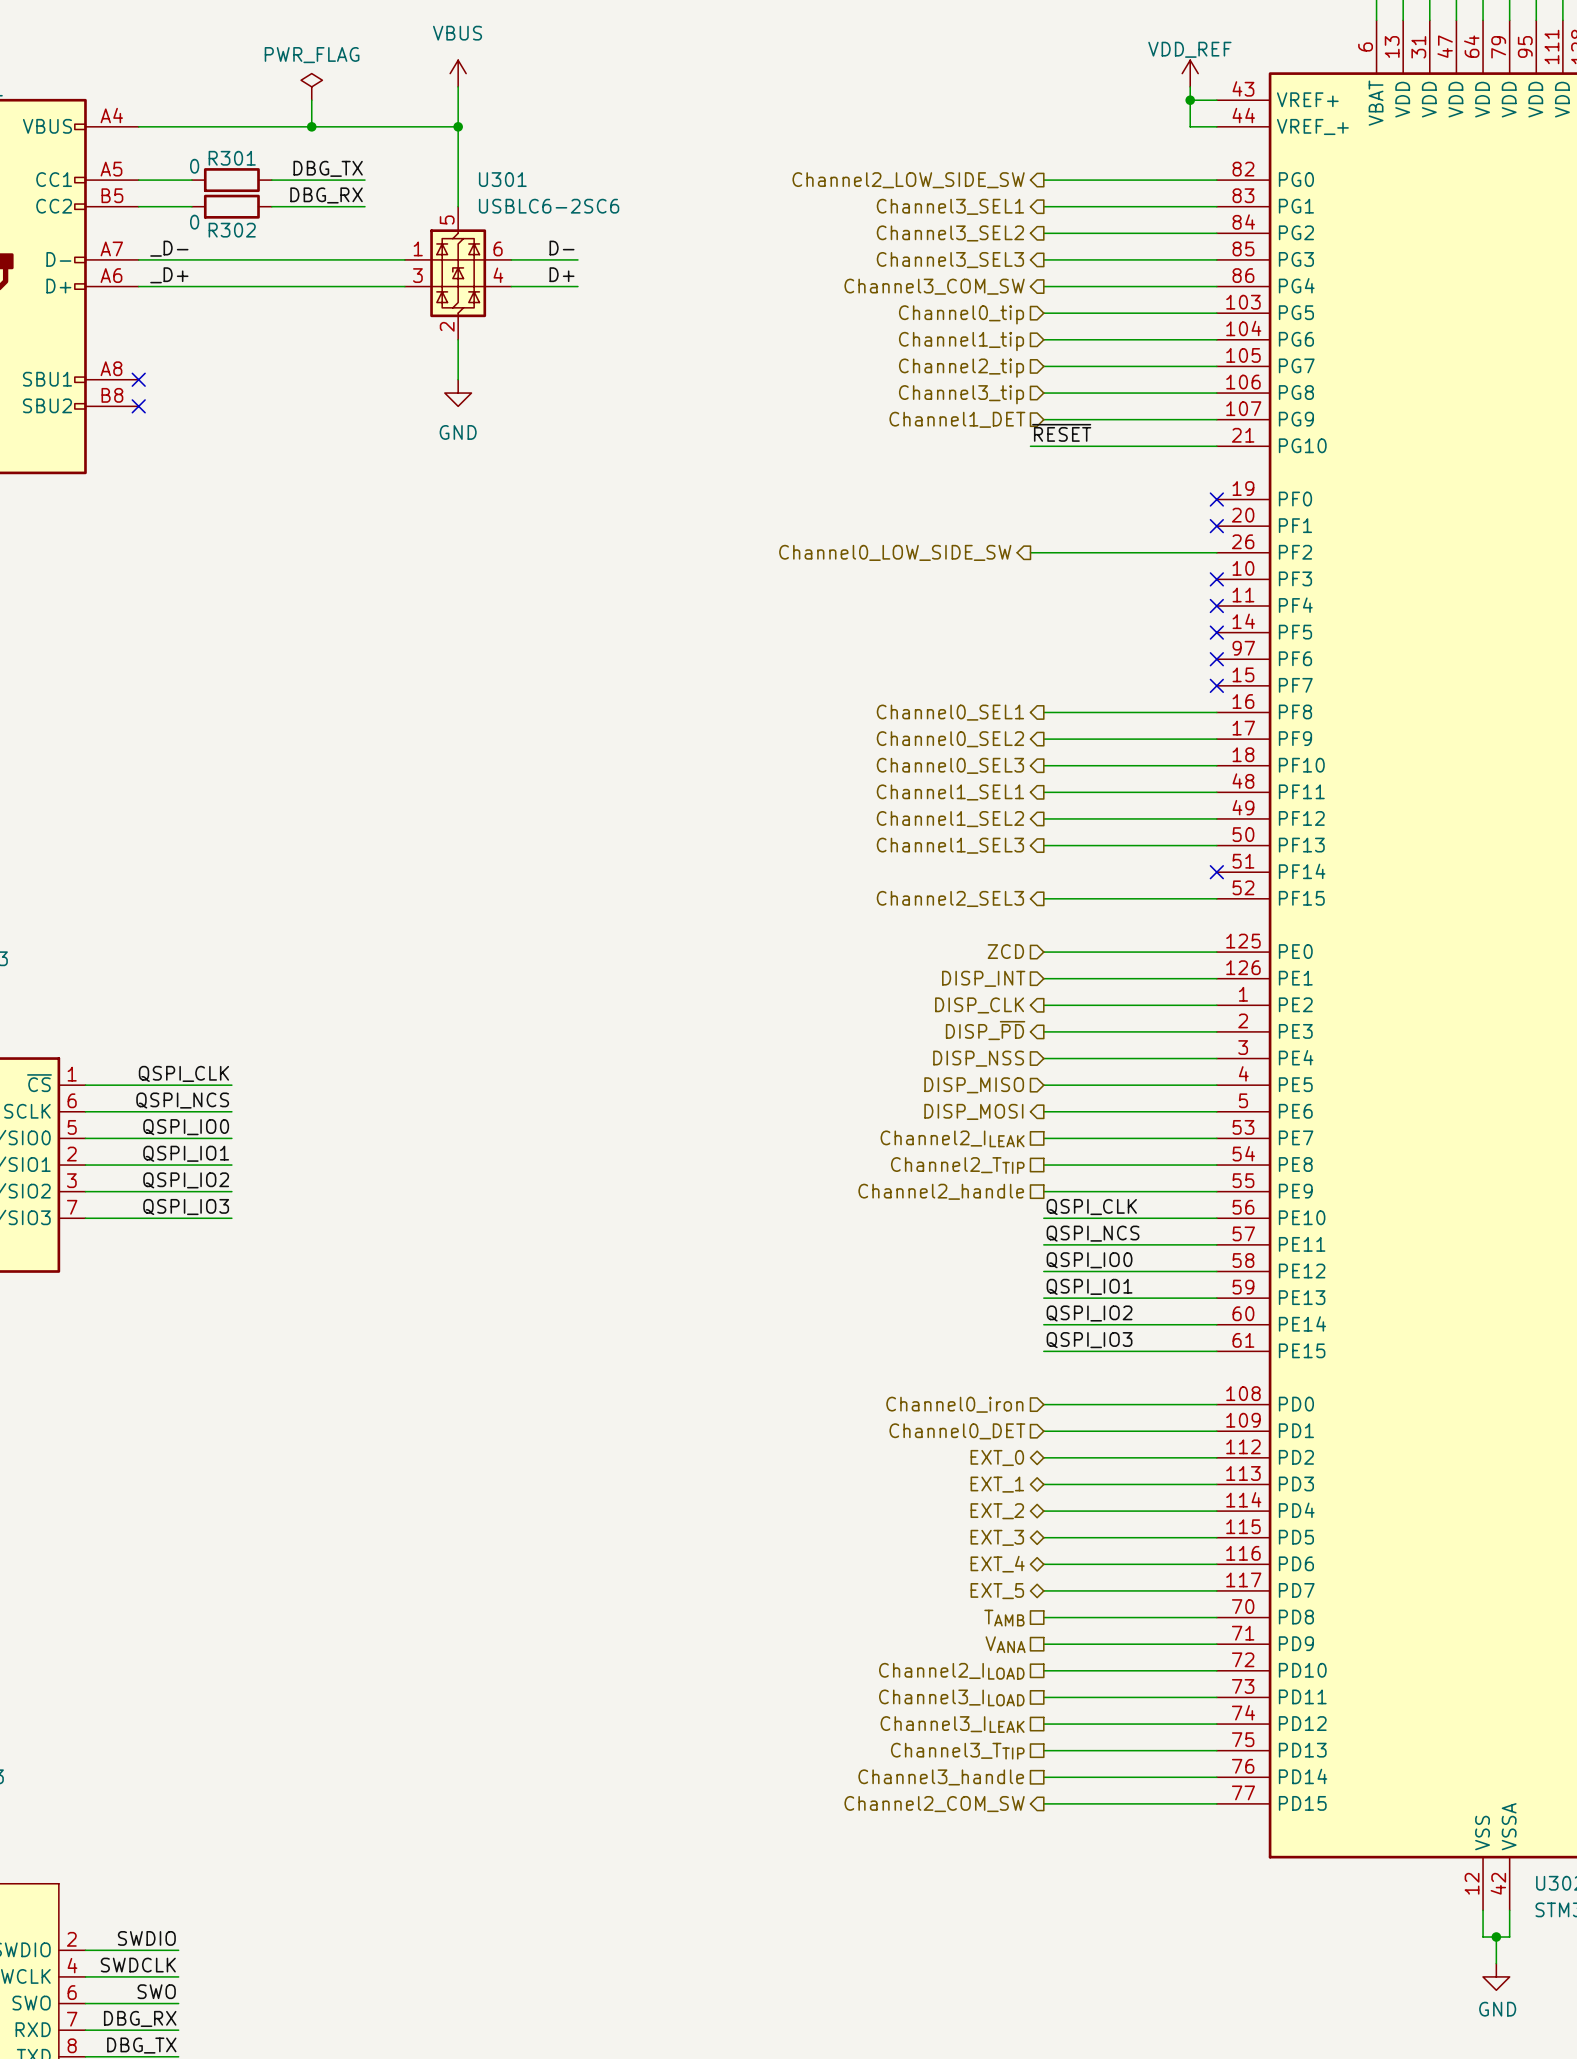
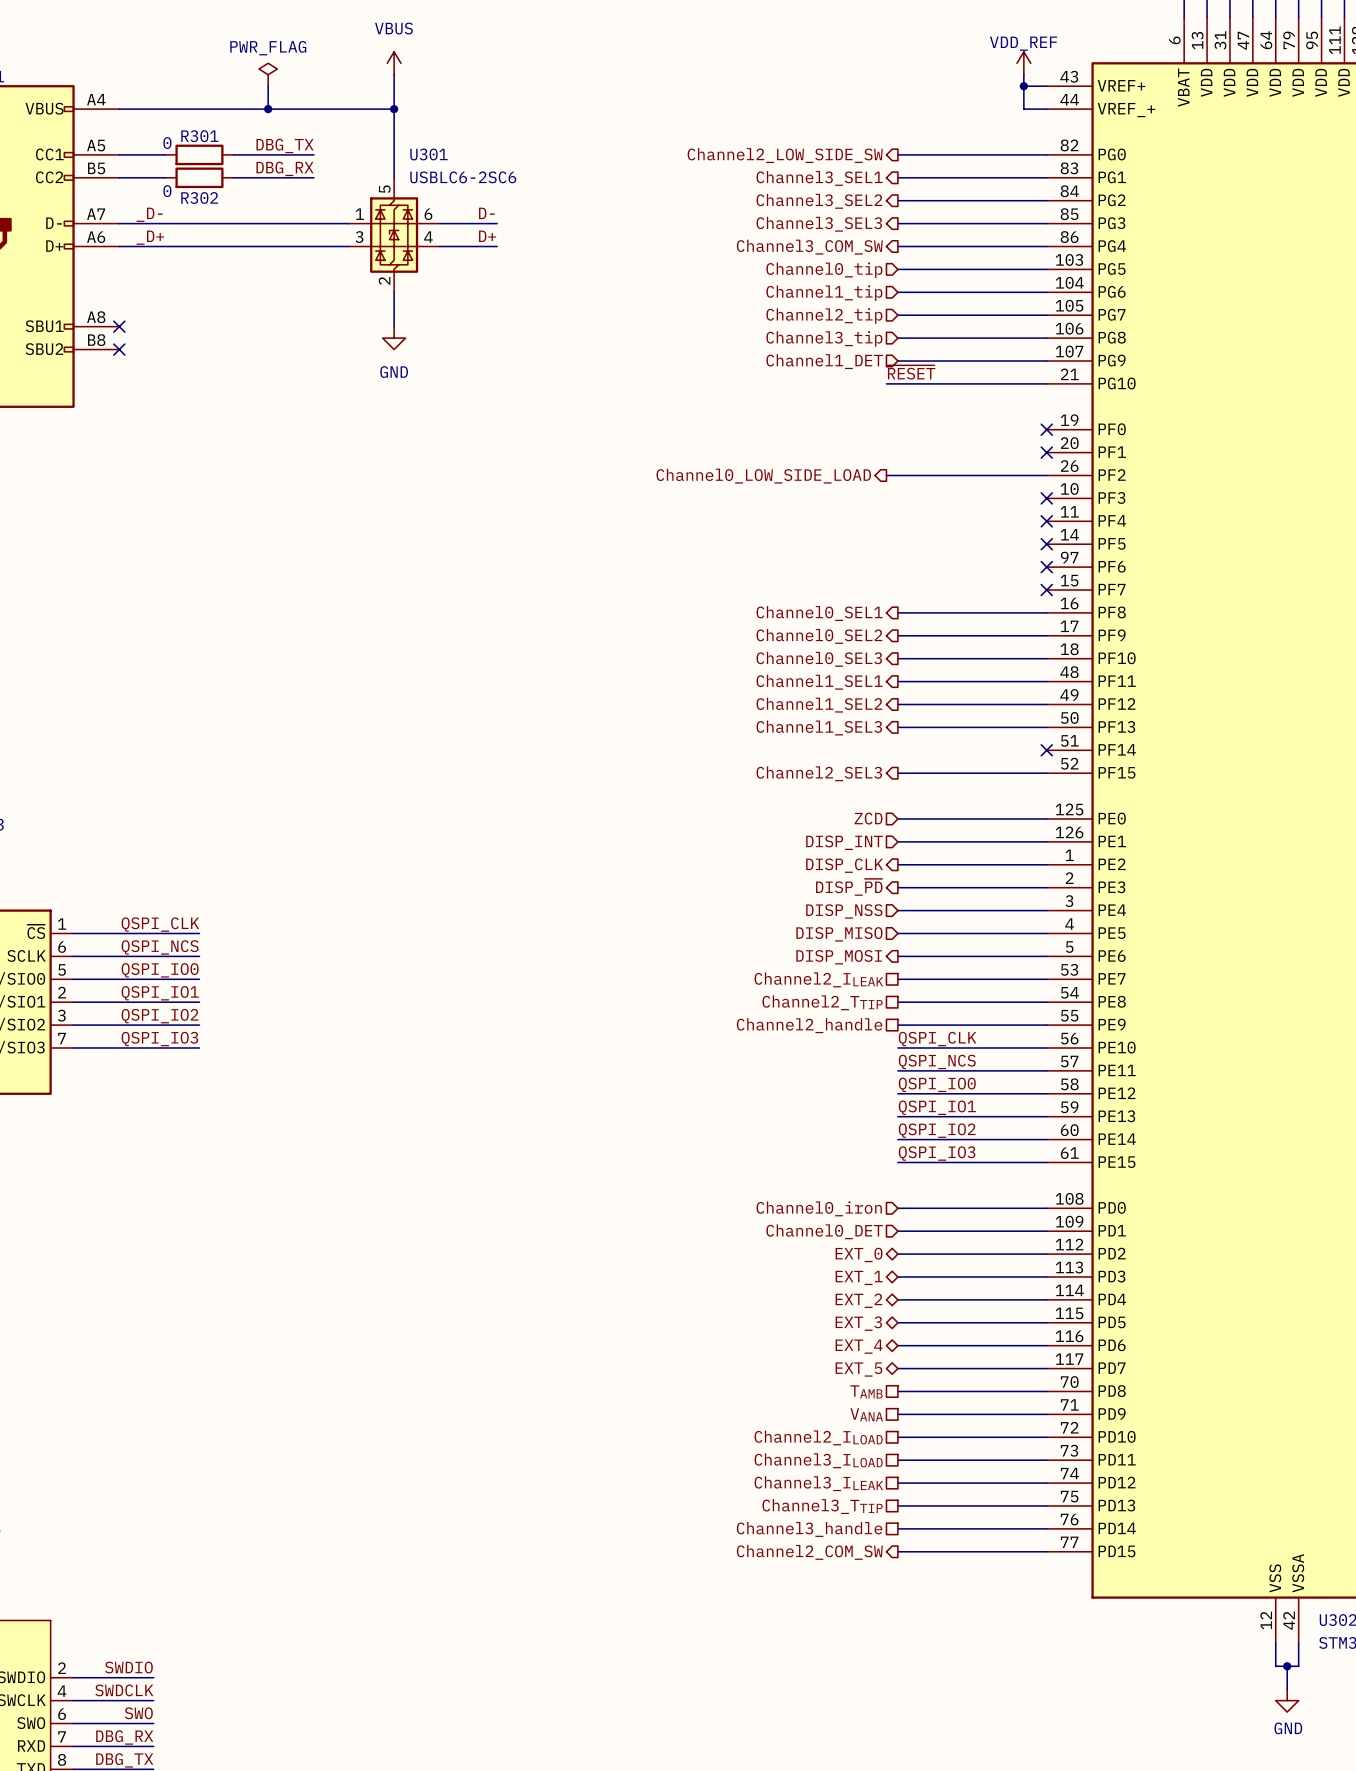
hierarchical label: Channel0_LOW_SIDE_SW (895, 552) -> Channel0_LOW_SIDE_LOAD (763, 476)

